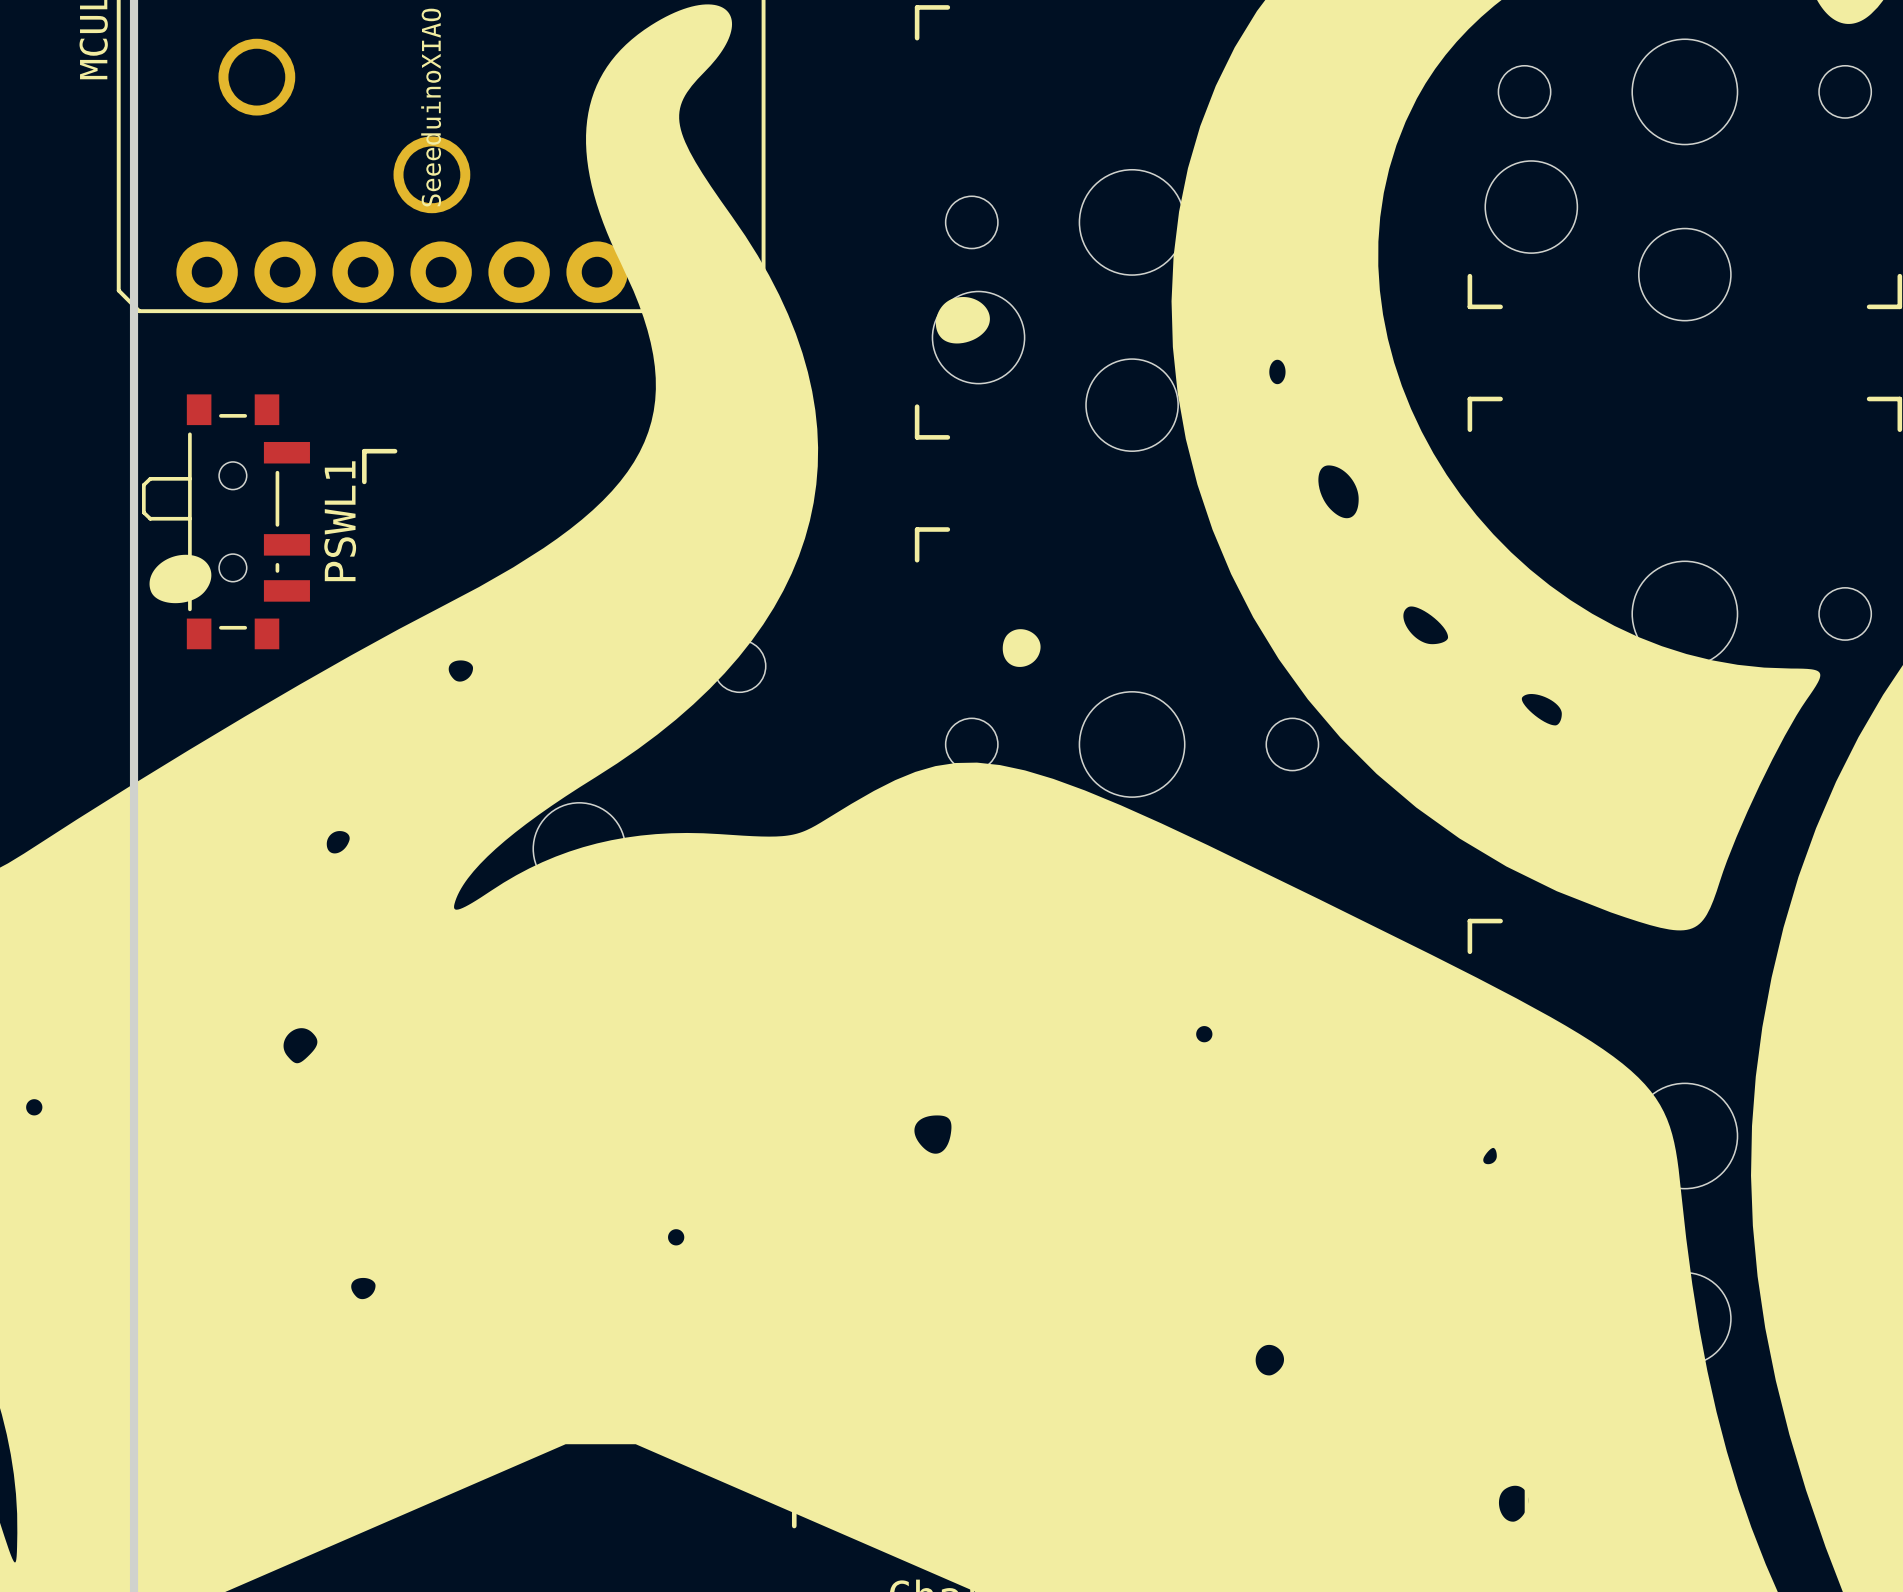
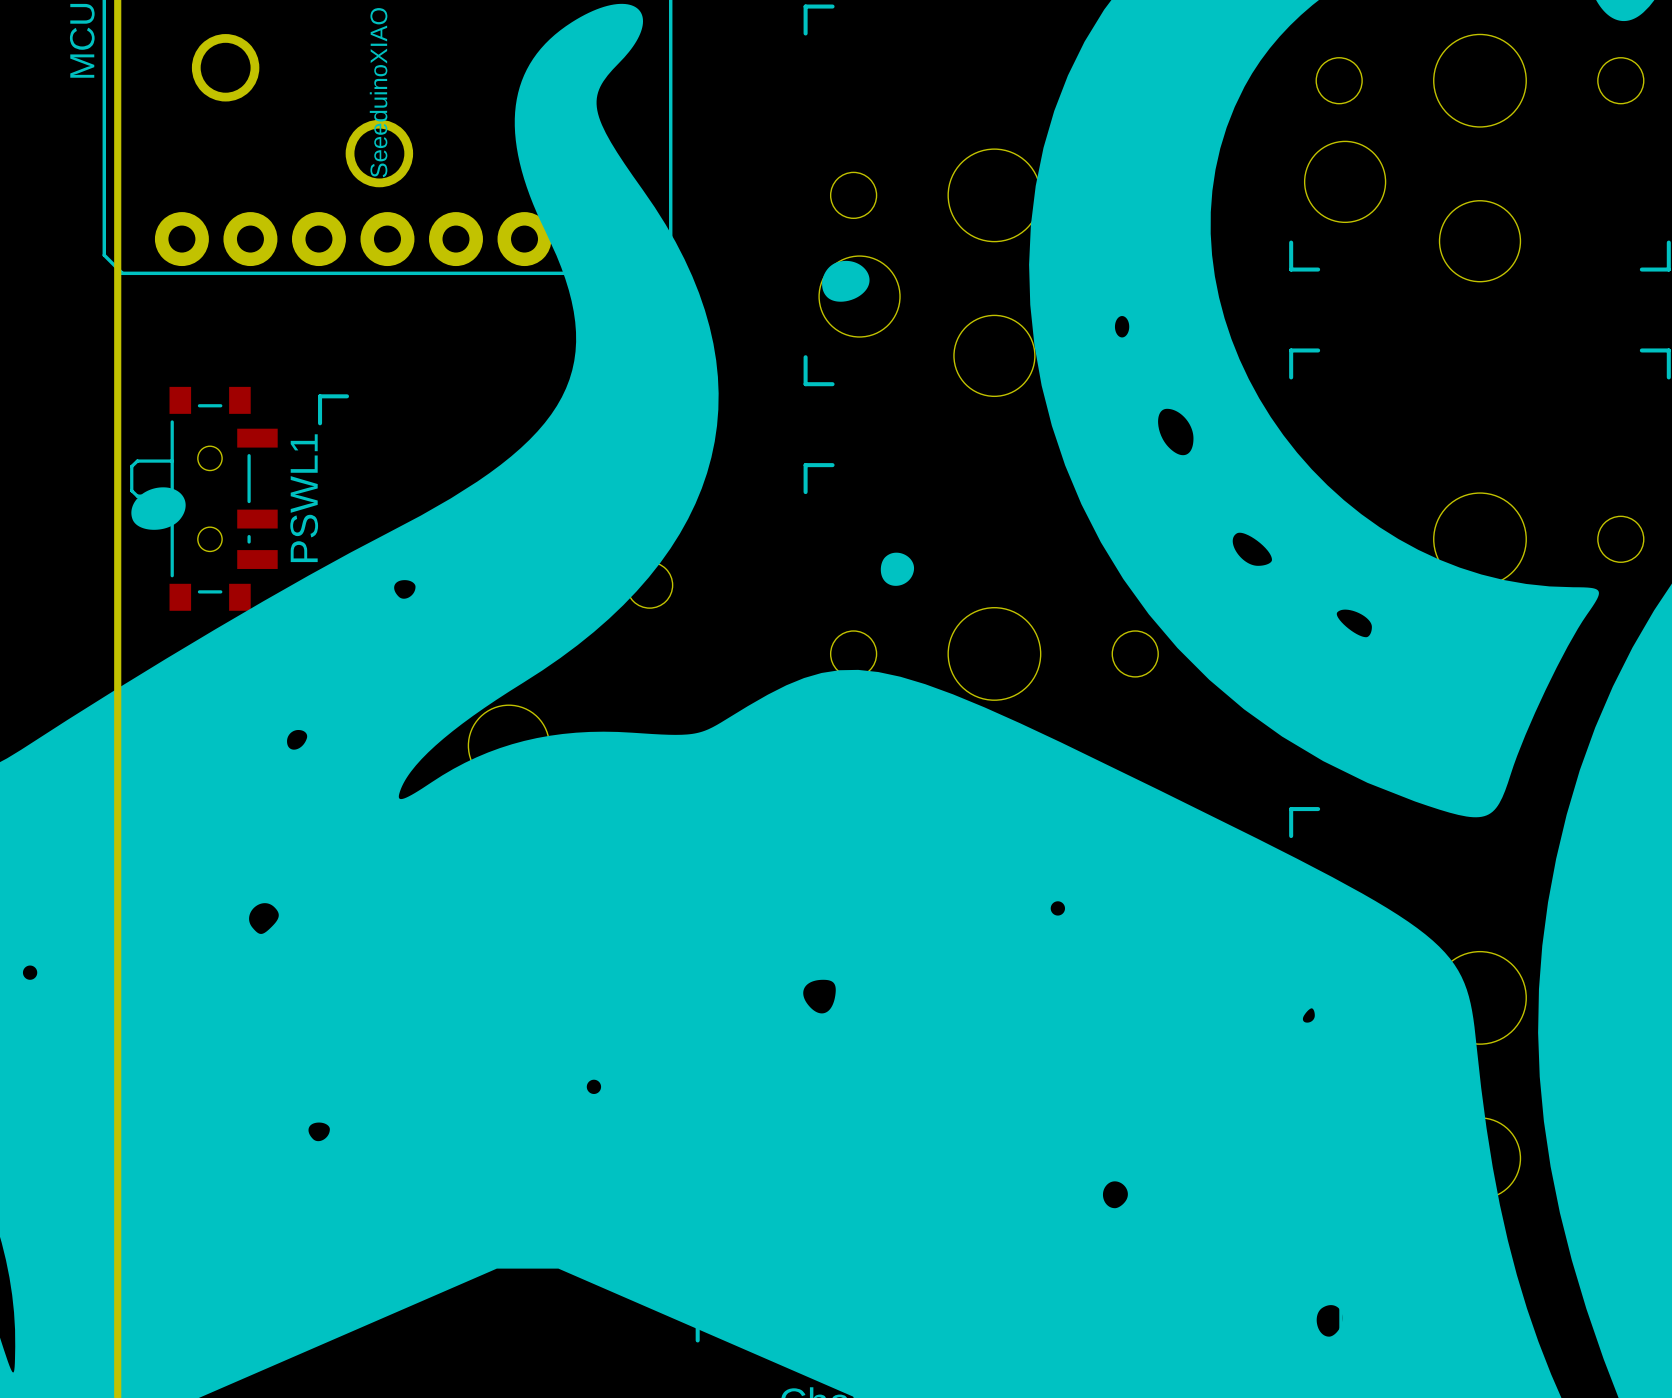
PSWL1 position: (225, 521) -> (203, 498)

